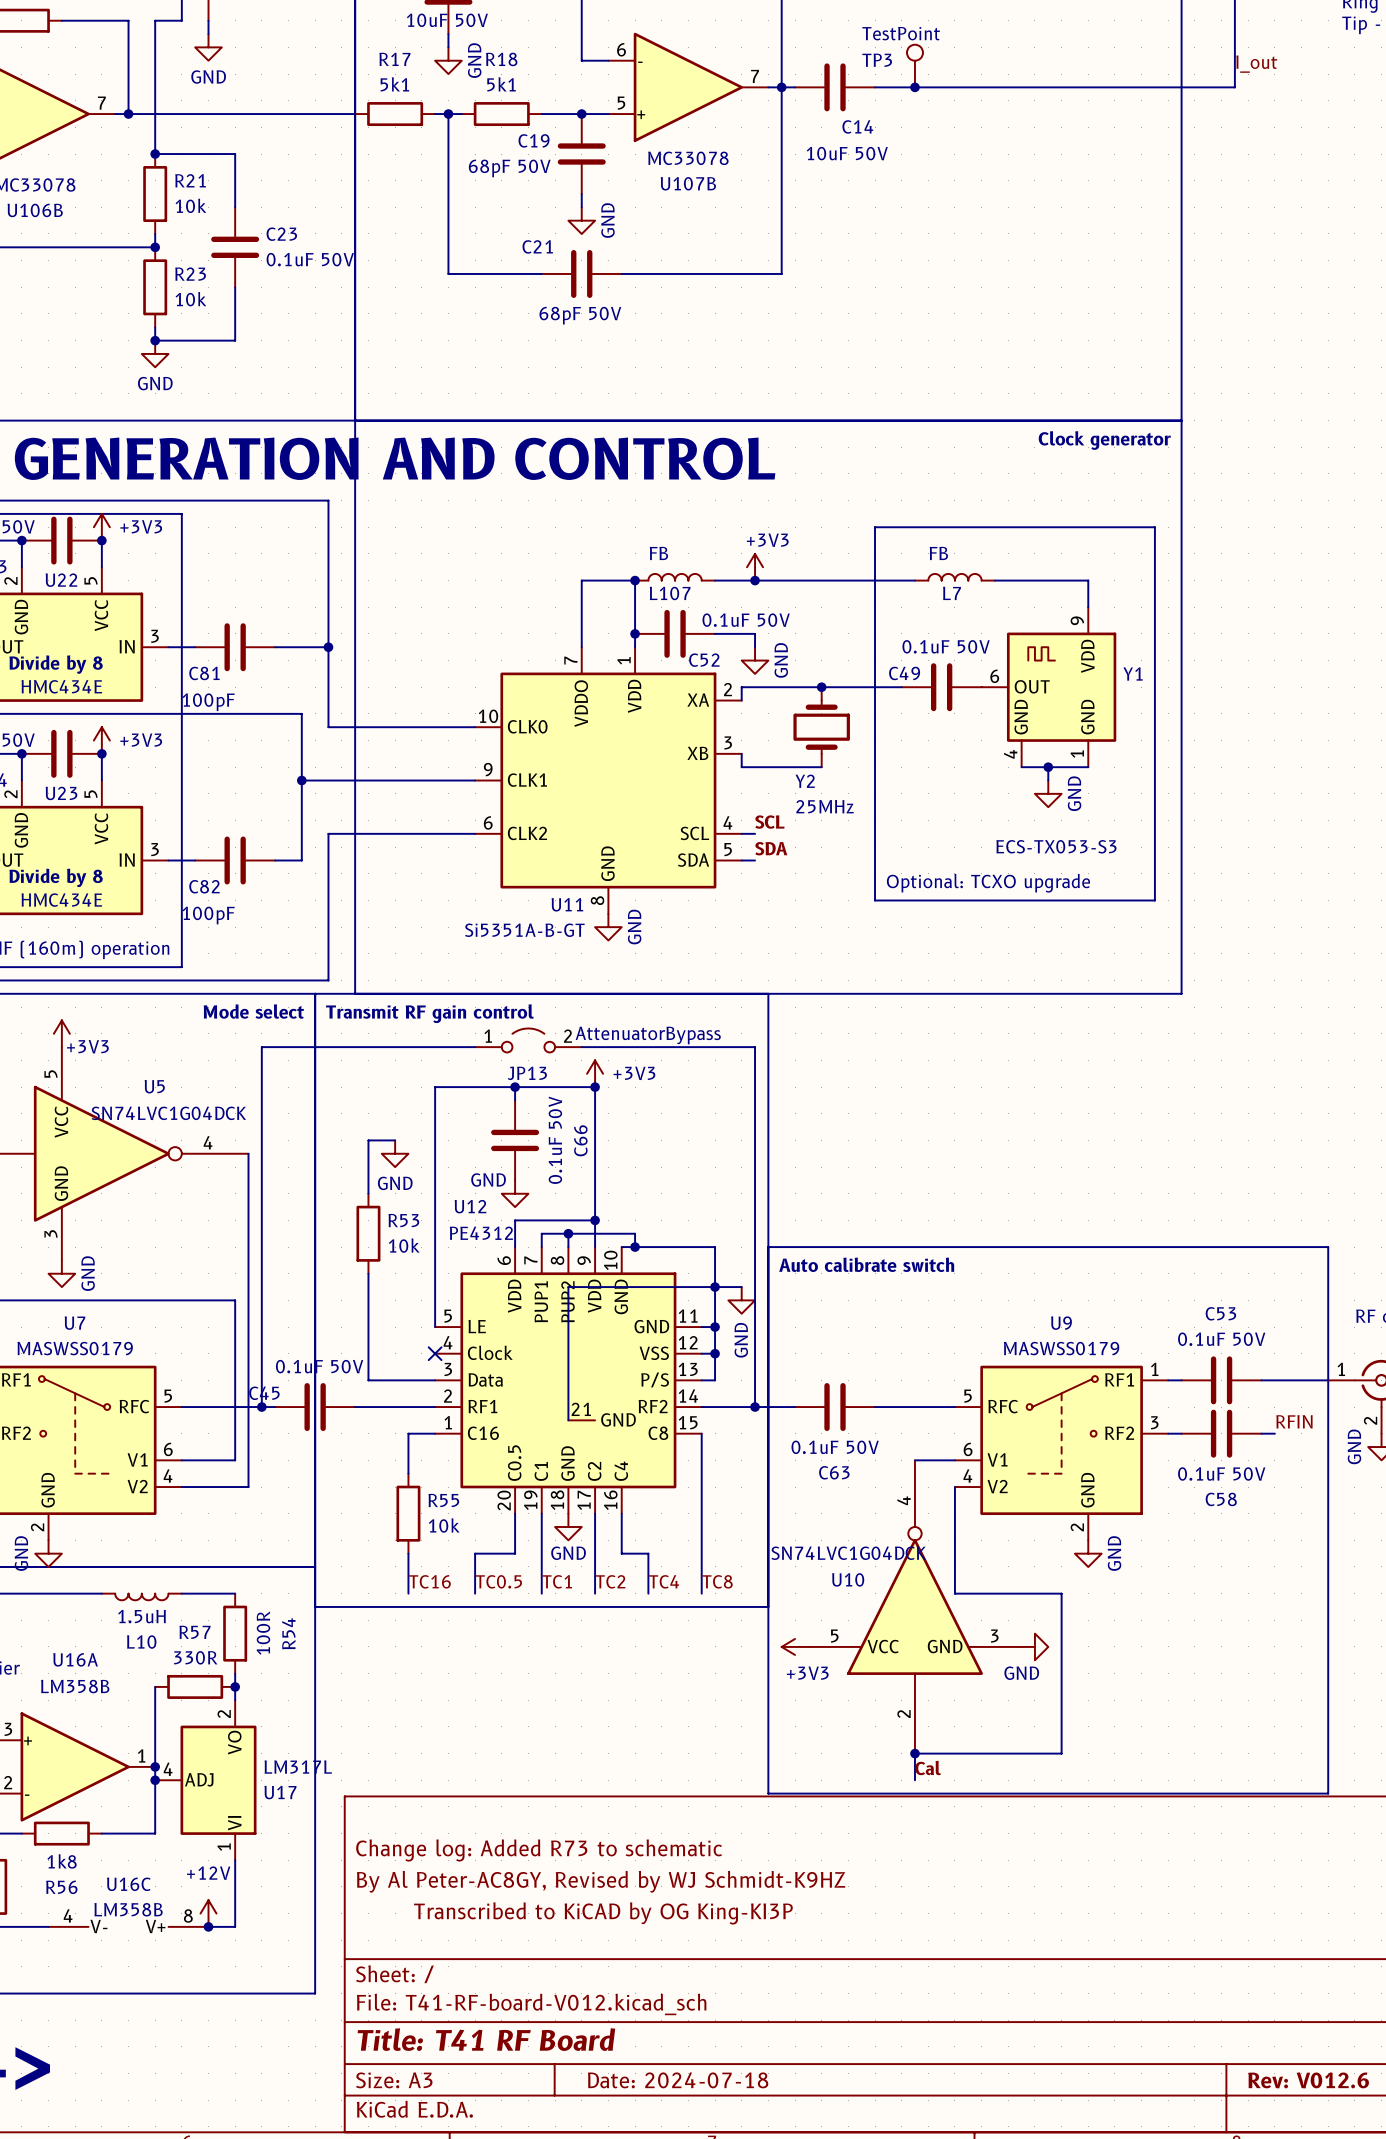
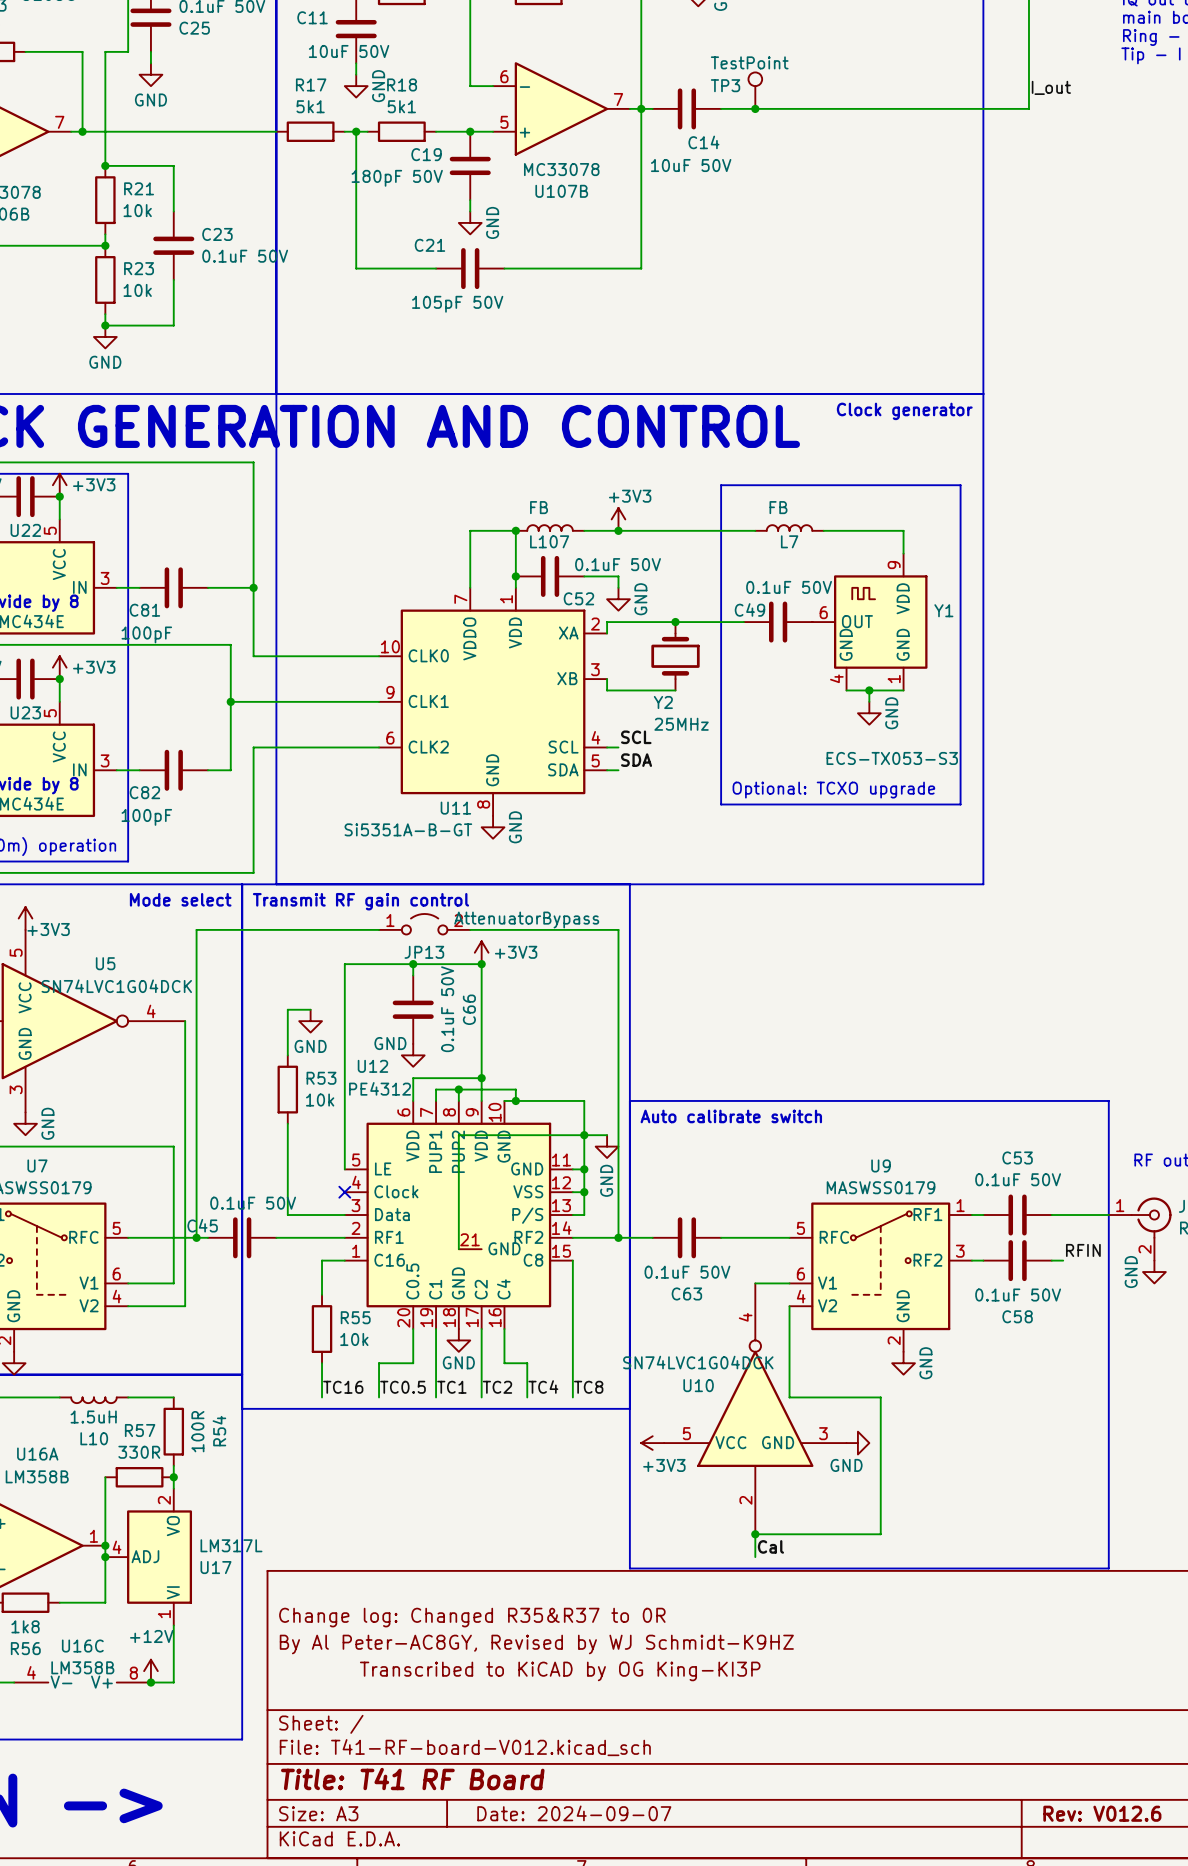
C19 value: 68pF 50V (509, 168) -> 180pF 50V (397, 178)
C21 value: 68pF 50V (580, 315) -> 105pF 50V (457, 304)
title block: Change log: Added R73 to schematic (539, 1850) -> Change log: Changed R35&R37 to 0R (472, 1617)
title block: Date: 2024-07-18 (678, 2080) -> Date: 2024-09-07 (574, 1813)

